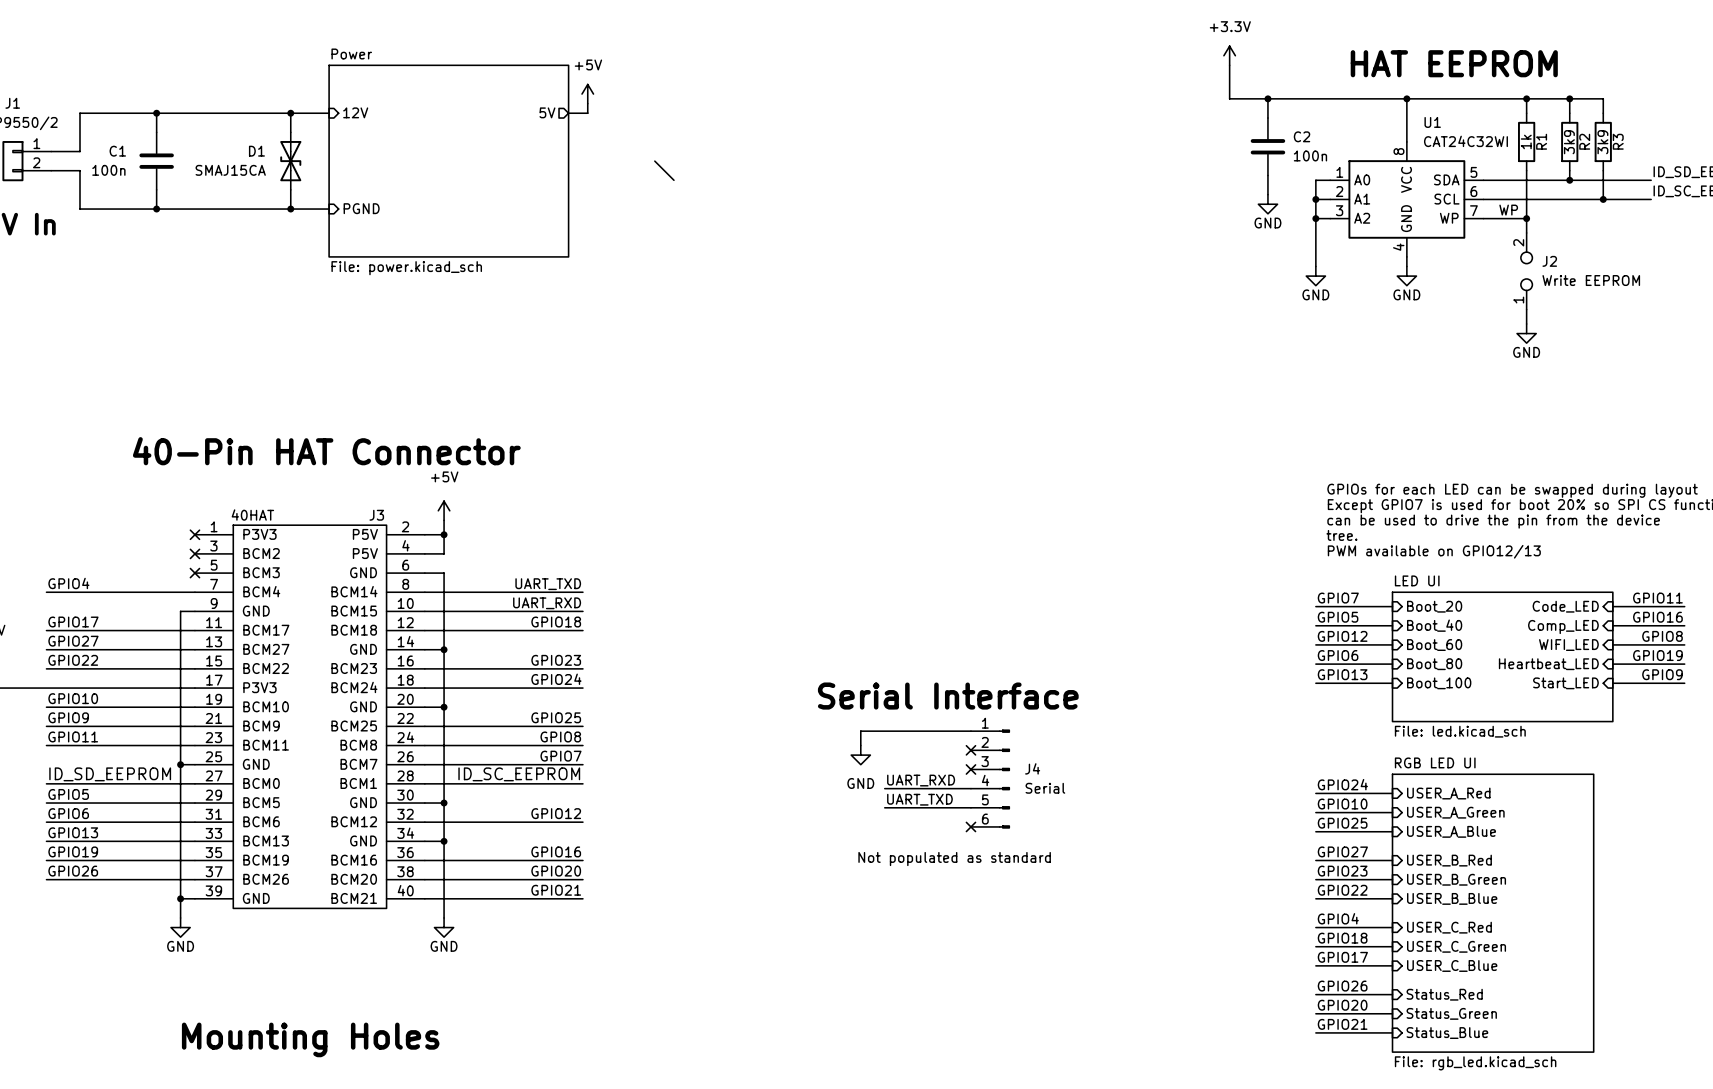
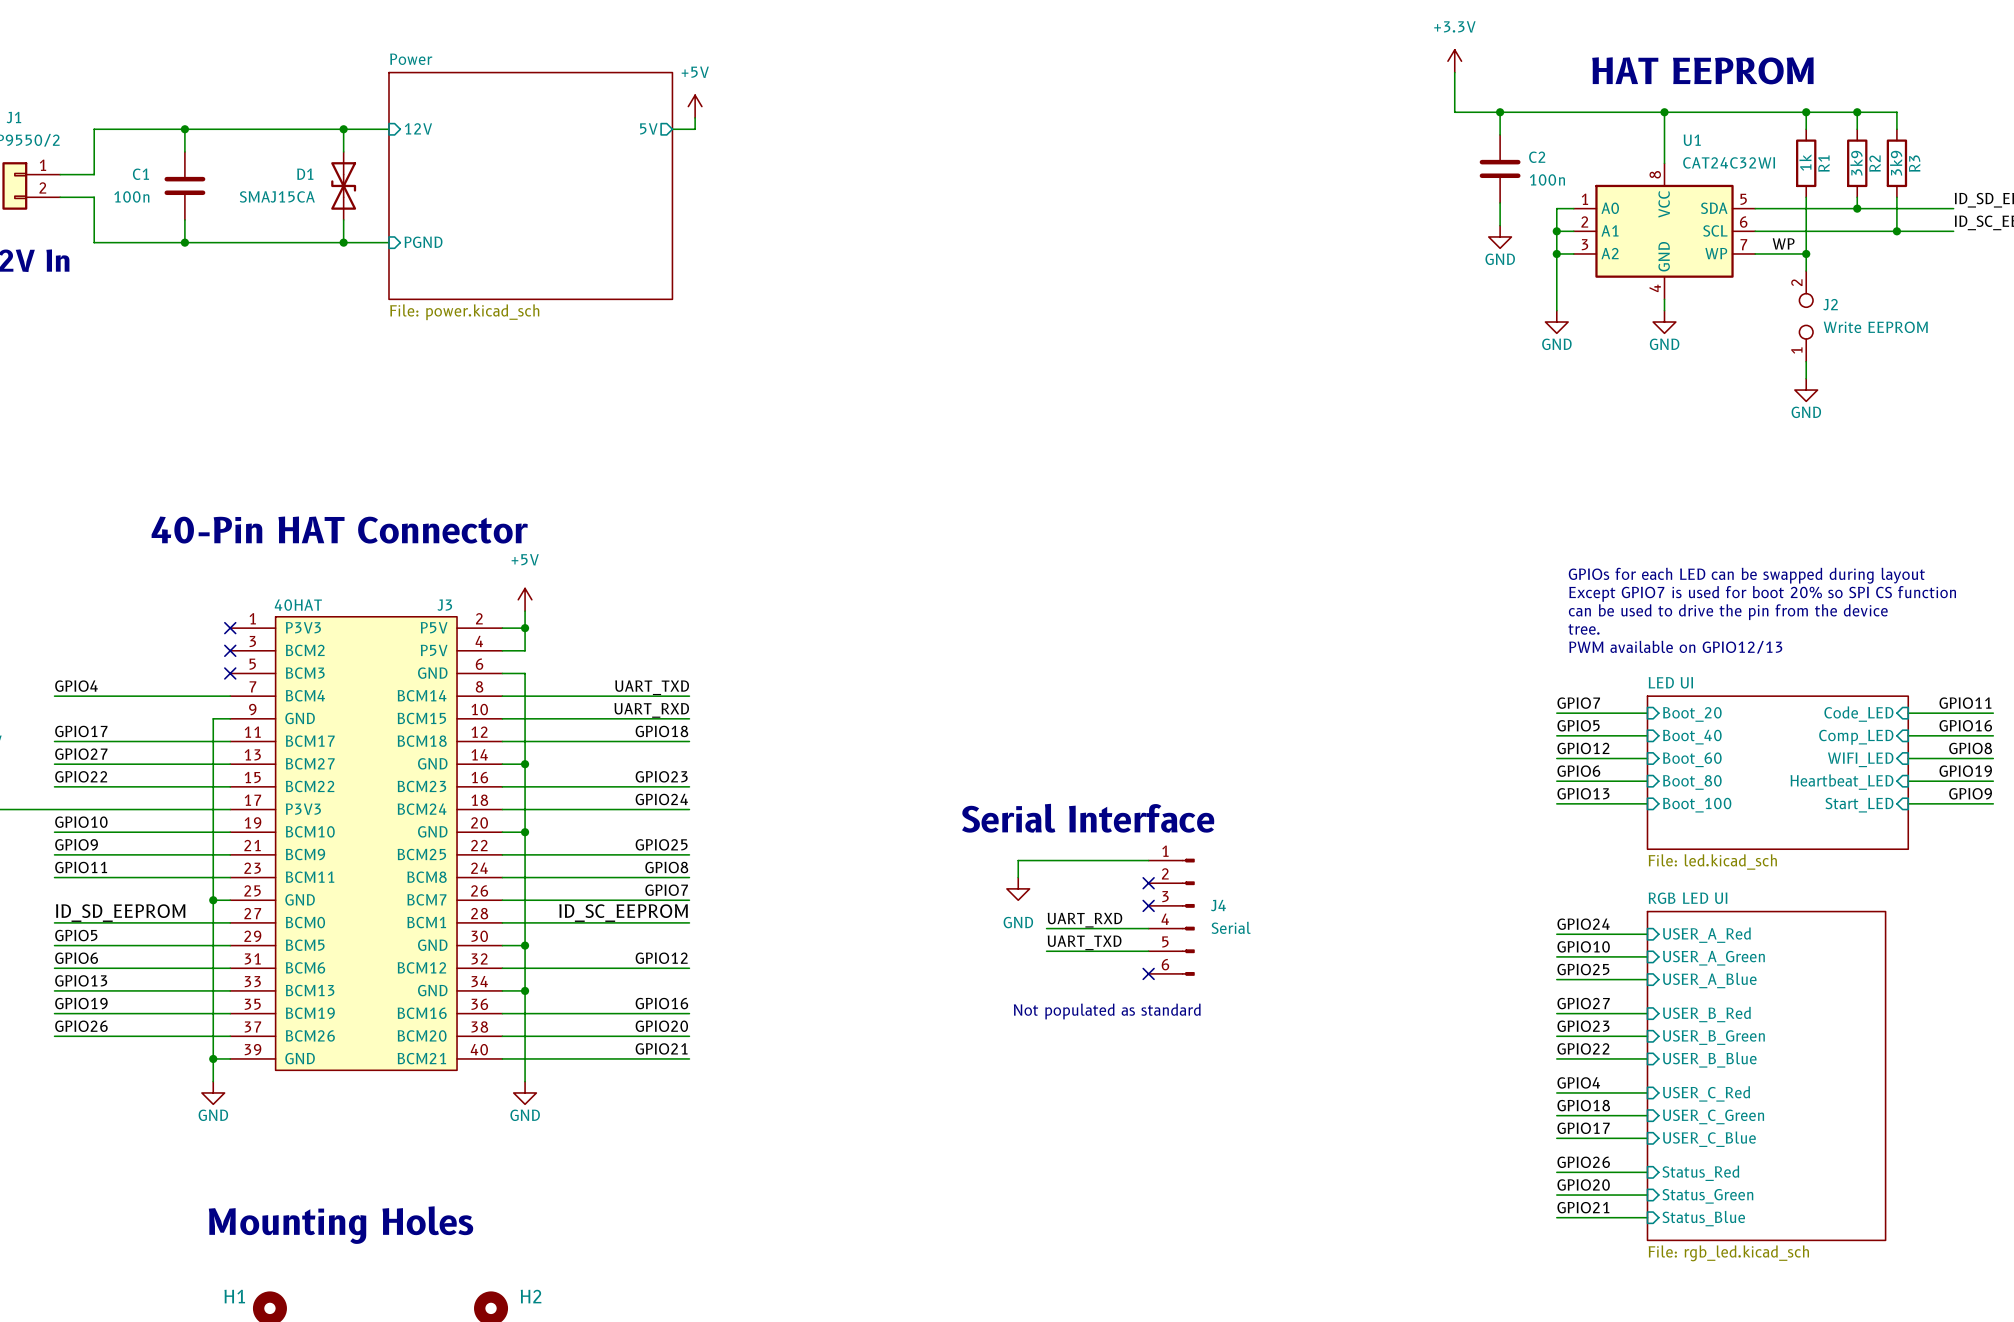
wire: (654, 161) (673, 180) -> none

